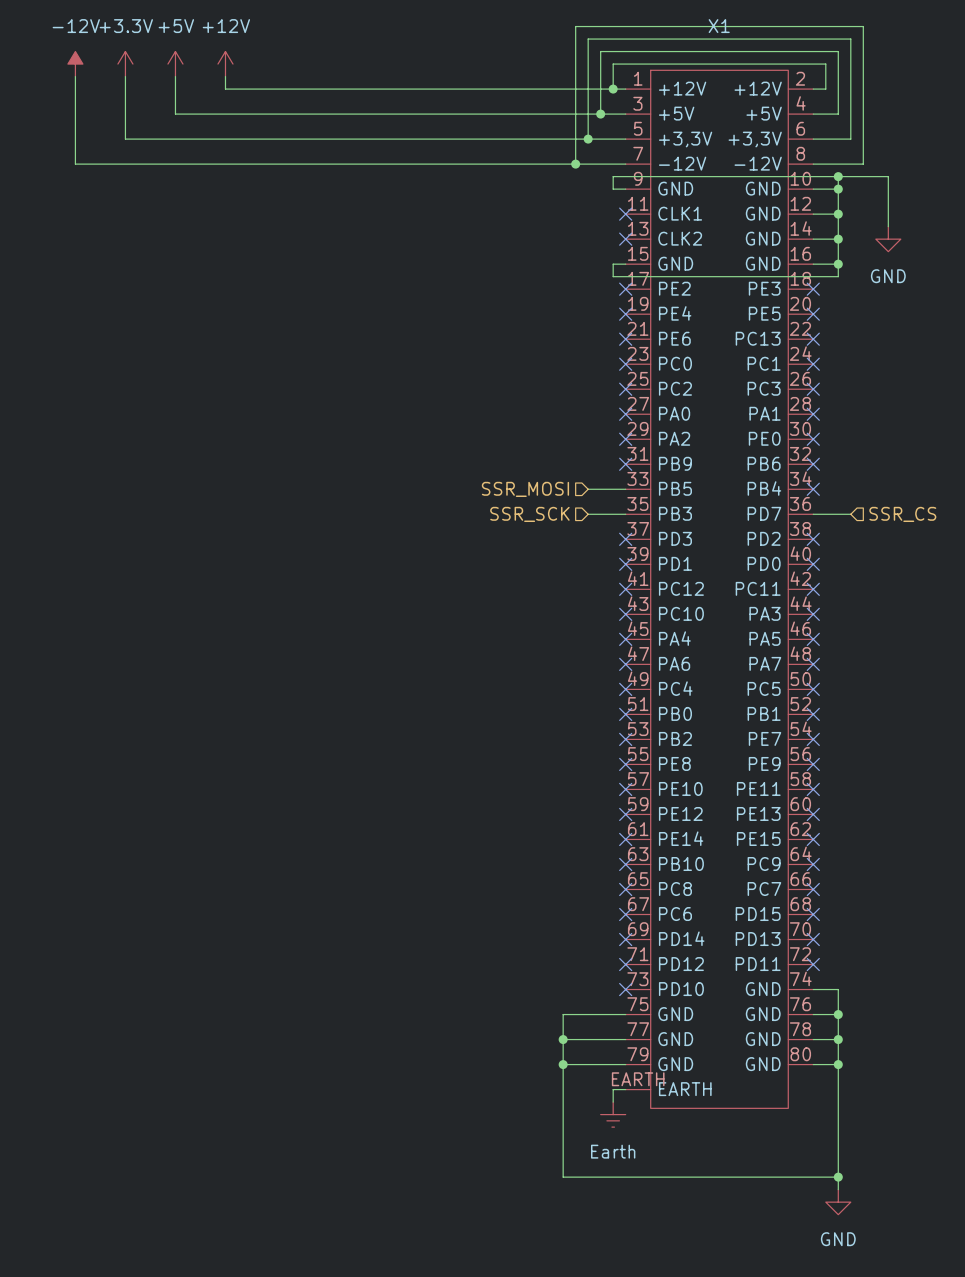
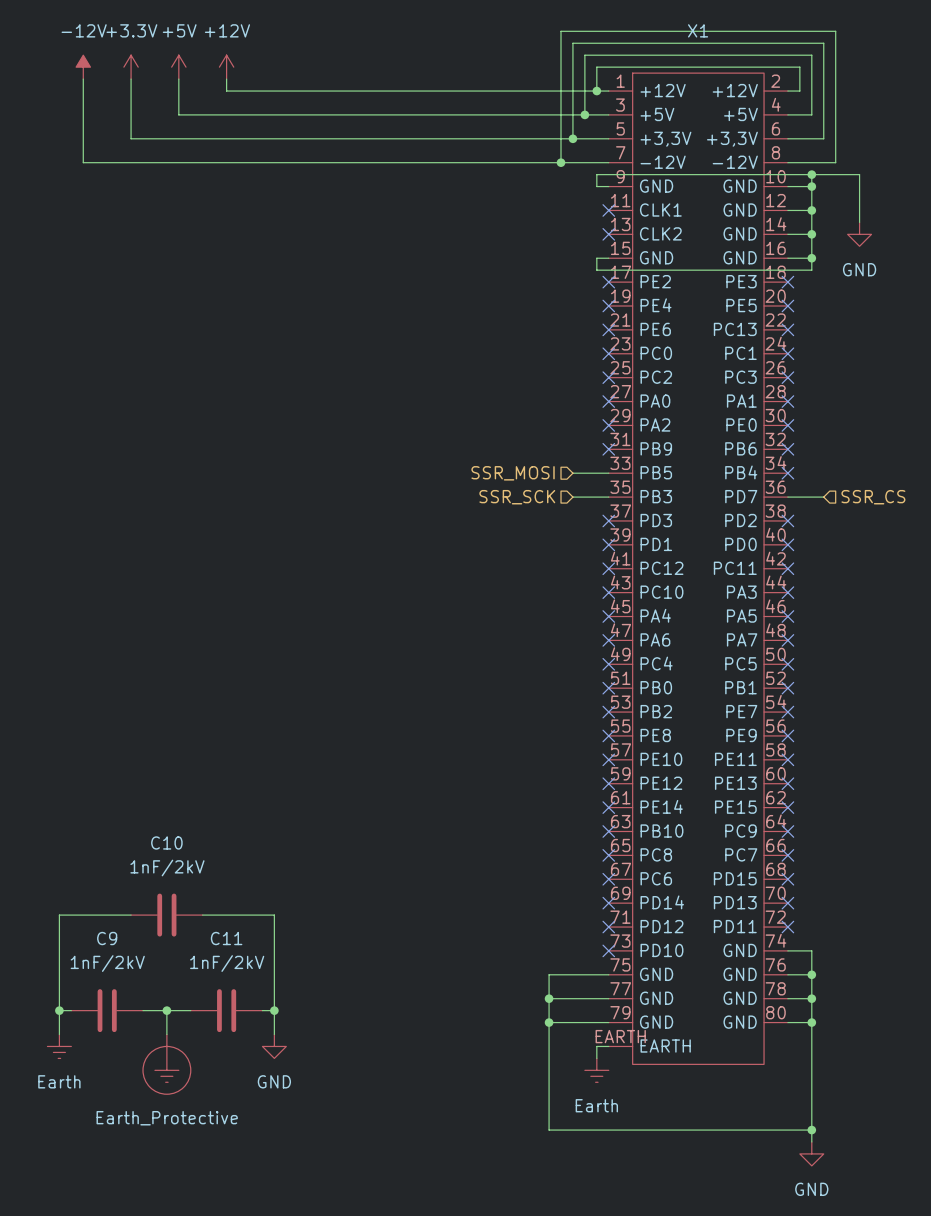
wire: none -> (131, 915) (59, 915) (59, 1034)
C10: none -> 1nF/2kV (166, 915)
wire: none -> (202, 915) (274, 915) (274, 1034)
wire: none -> (59, 1010) (71, 1010)
junction: none -> (59, 1010)
C9: none -> 1nF/2kV (107, 1010)
wire: none -> (143, 1010) (190, 1010)
wire: none -> (166, 1010) (166, 1034)
junction: none -> (166, 1010)
C11: none -> 1nF/2kV (226, 1010)
wire: none -> (262, 1010) (274, 1010)
junction: none -> (274, 1010)
power symbol: none -> Earth (59, 1046)
power symbol: none -> GND (274, 1046)
power symbol: none -> Earth_Protective (166, 1064)

